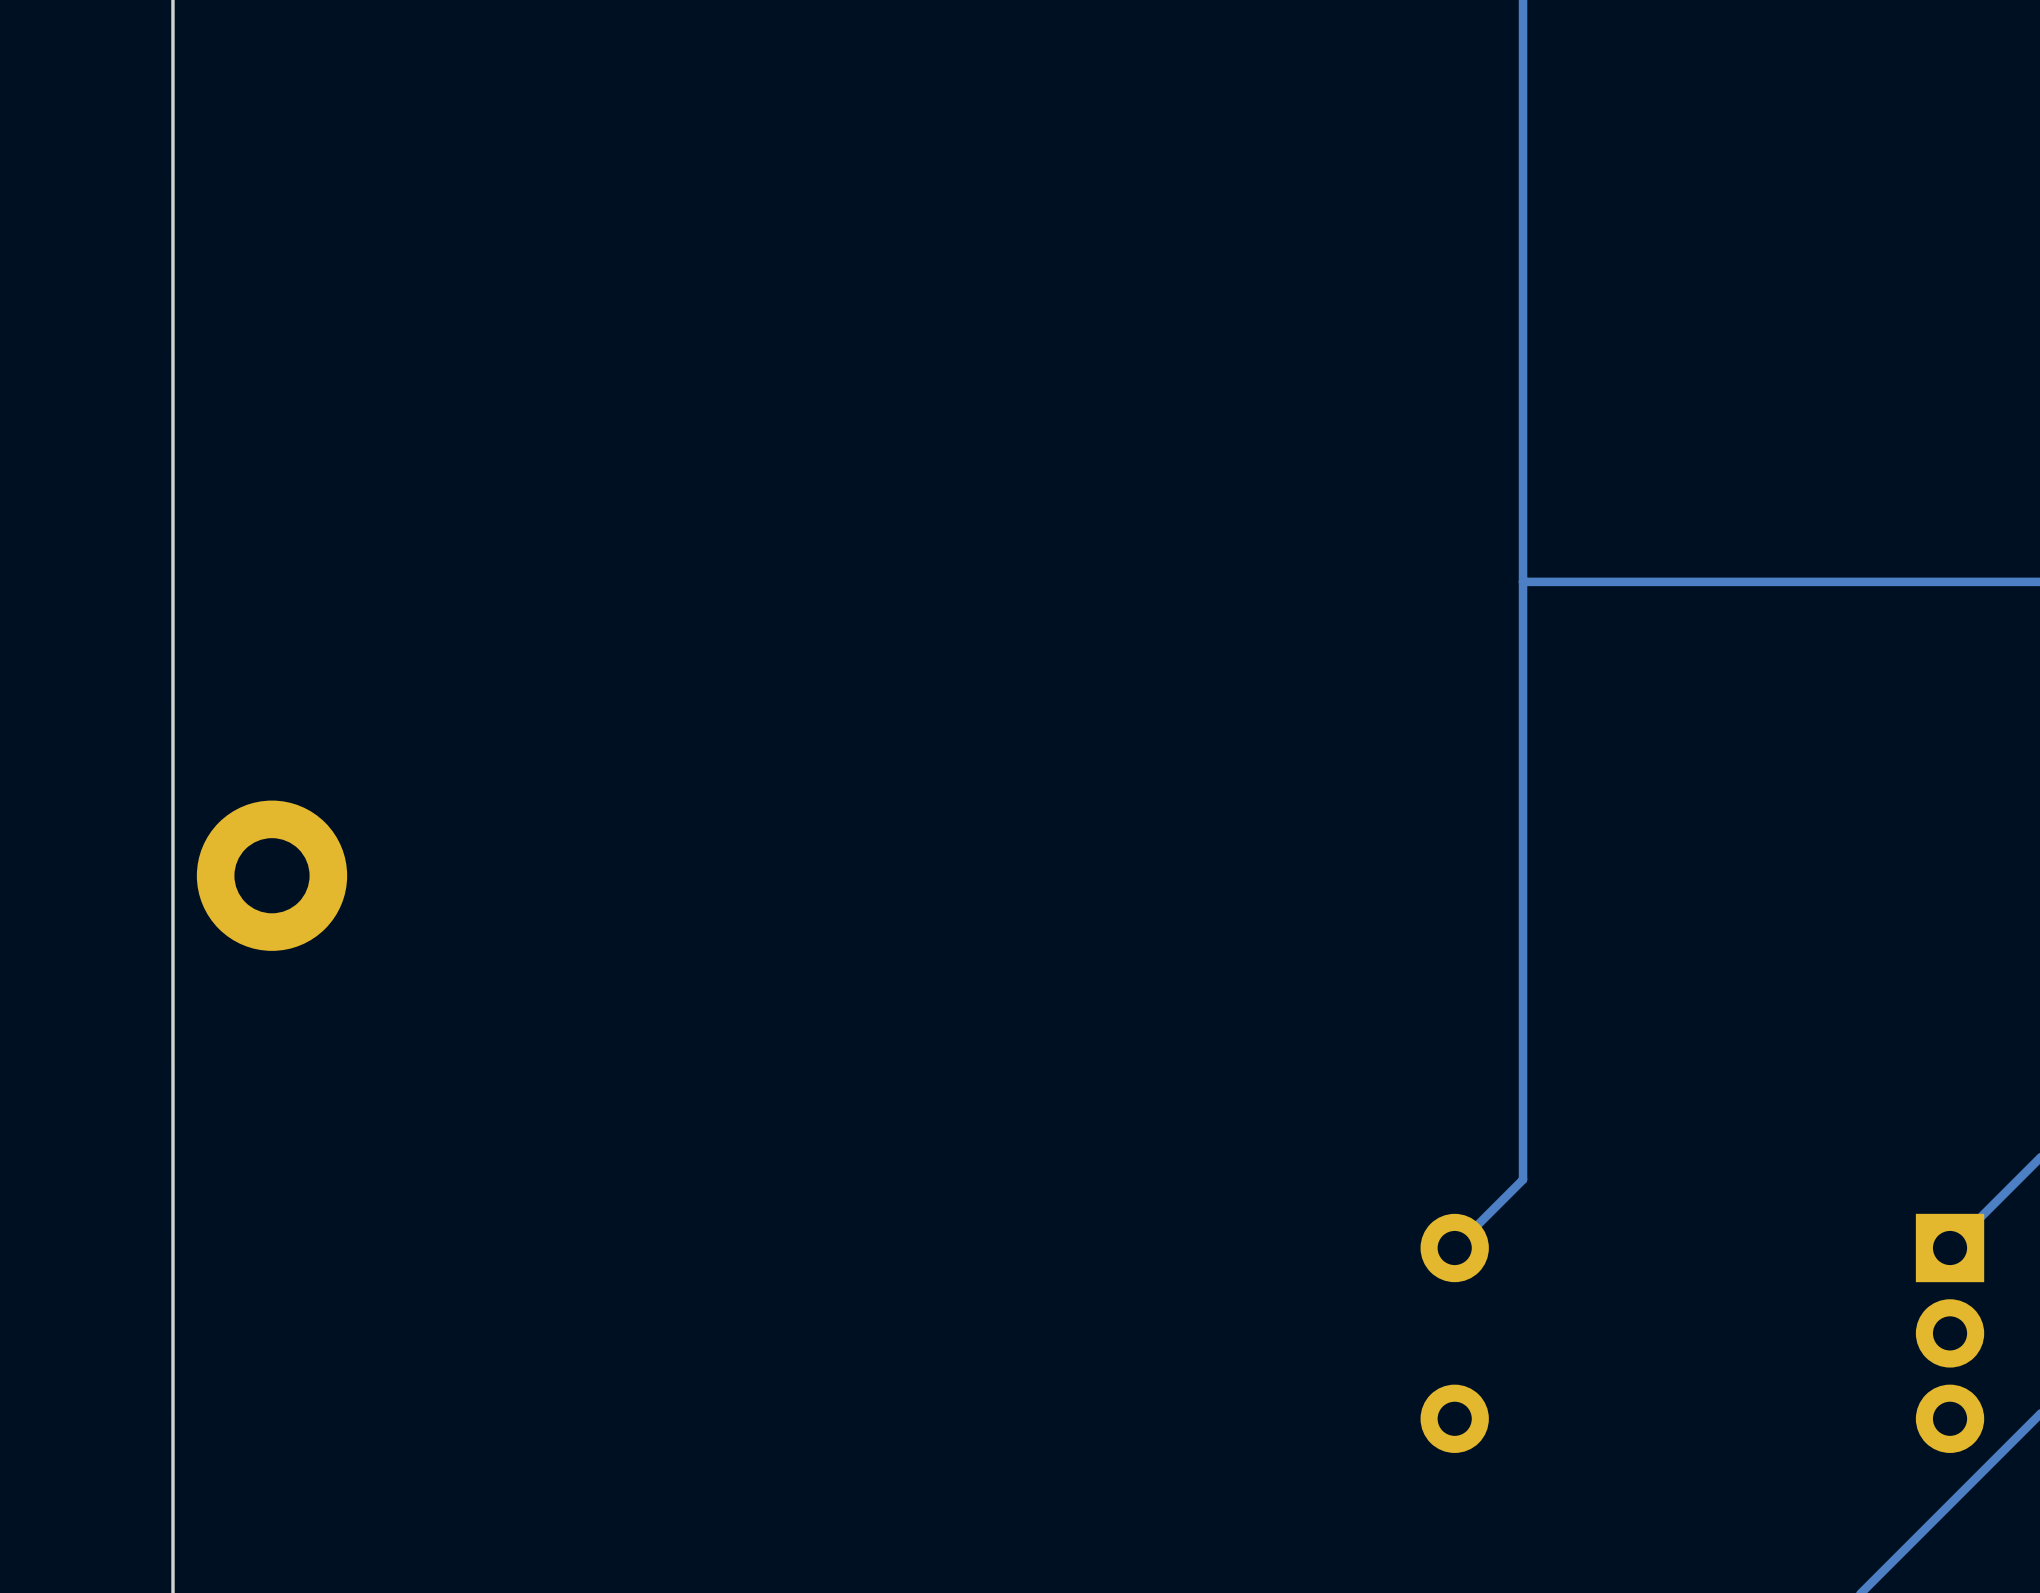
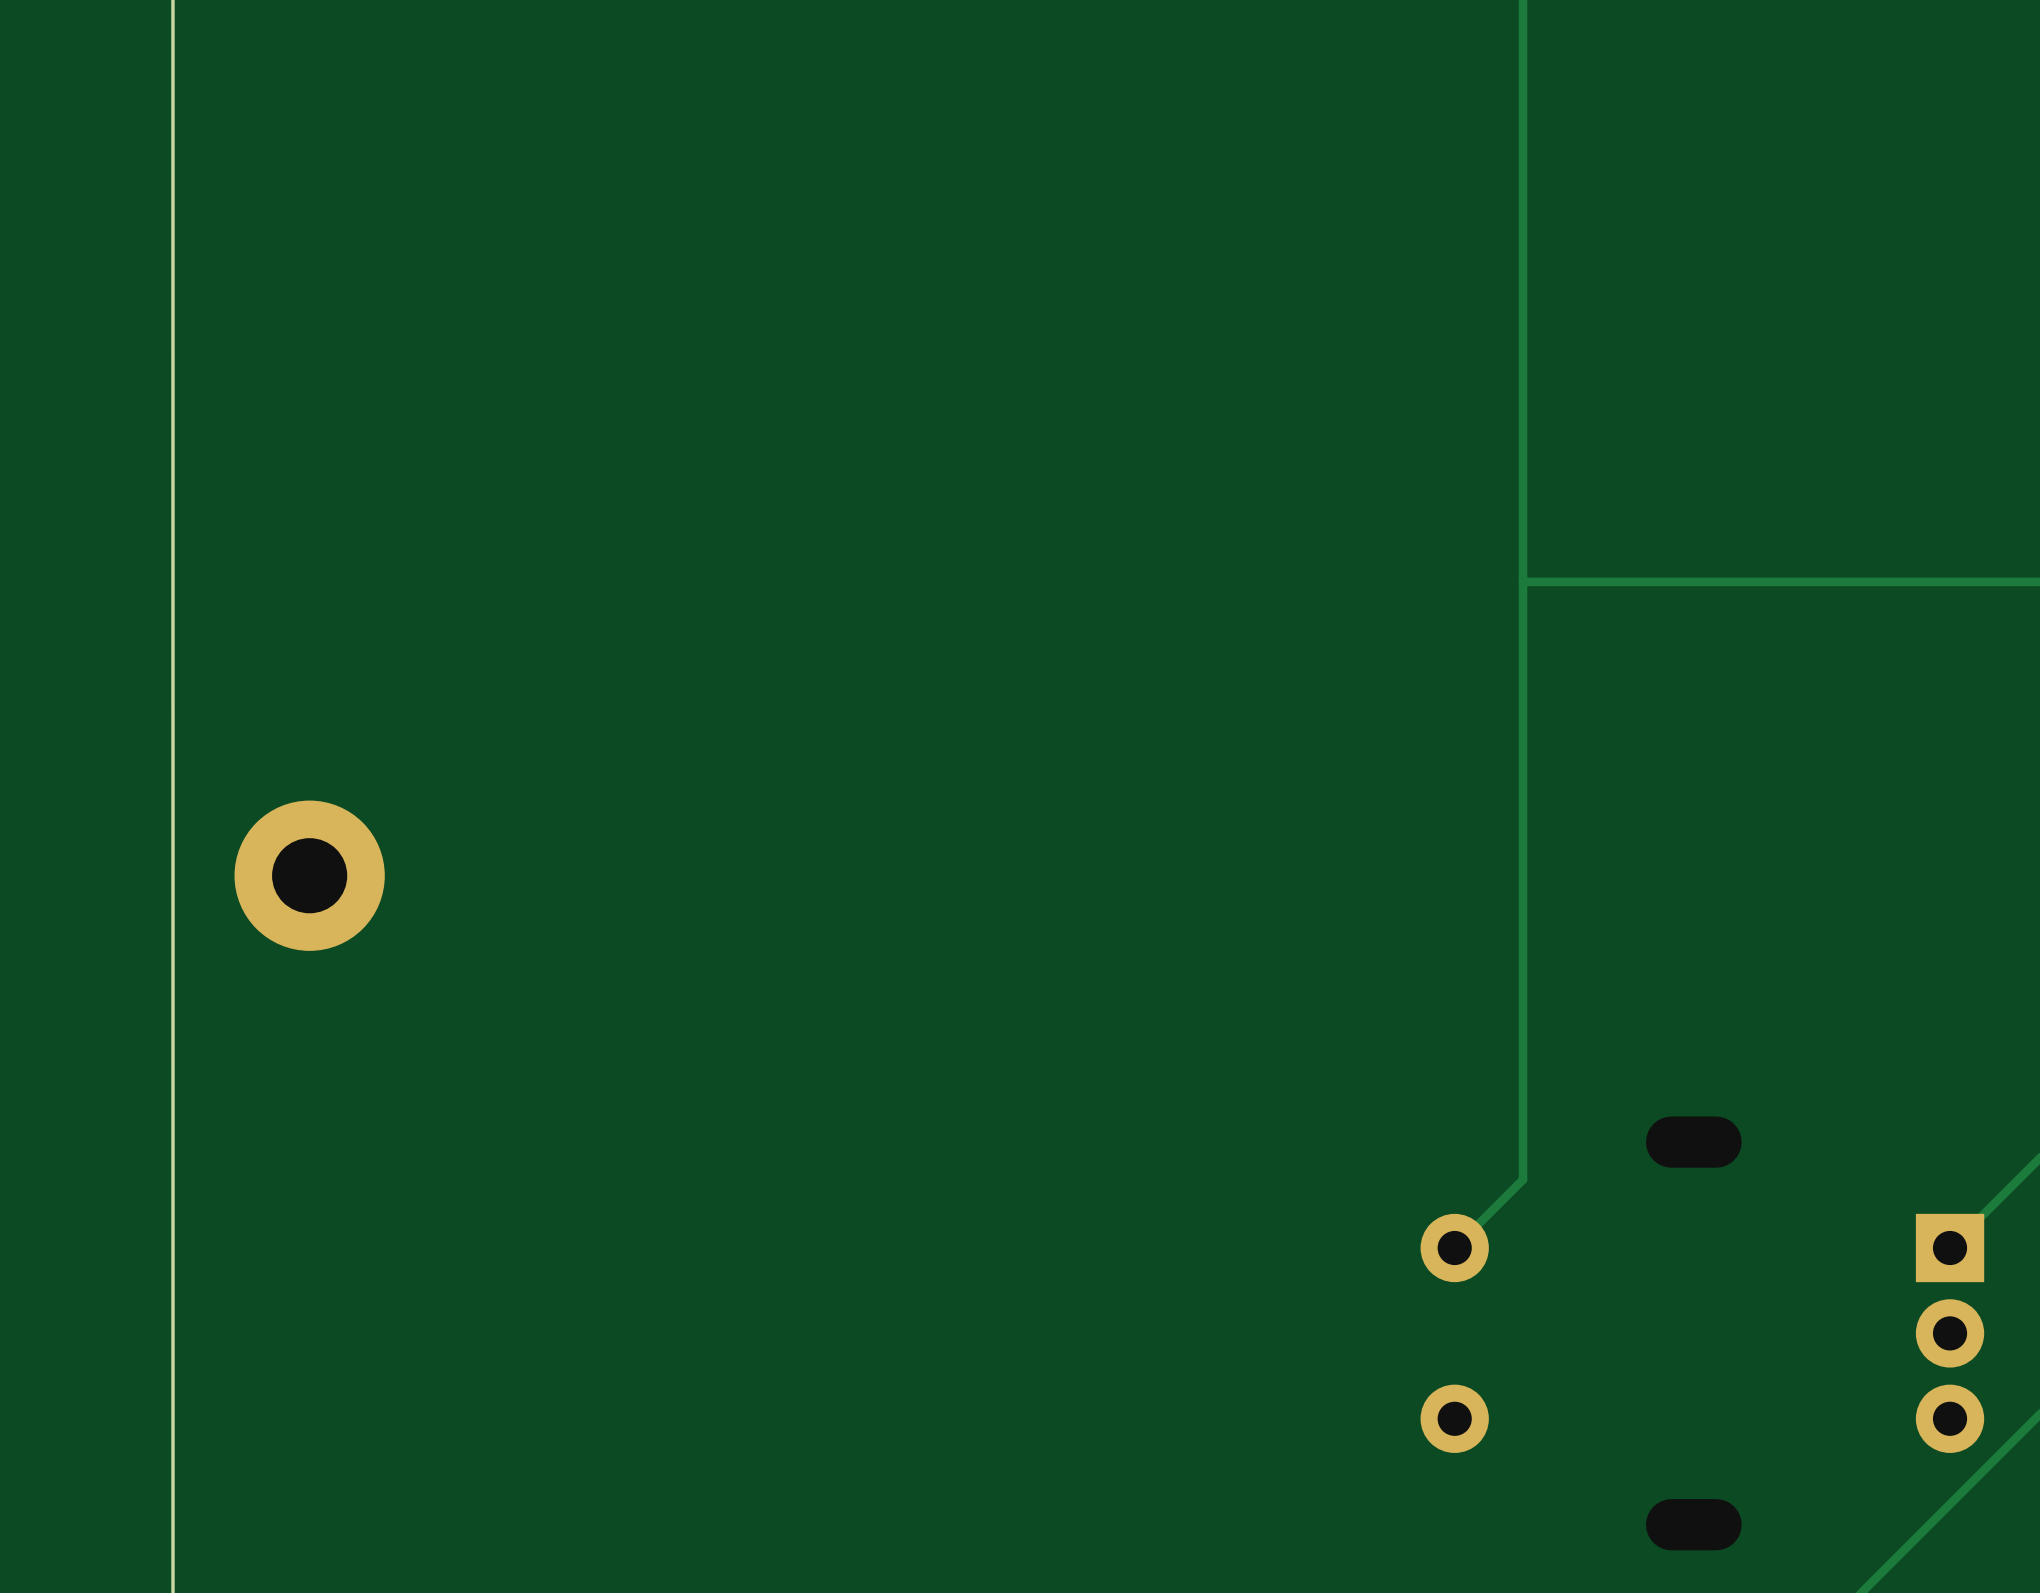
part position: (272, 875) -> (309, 875)

